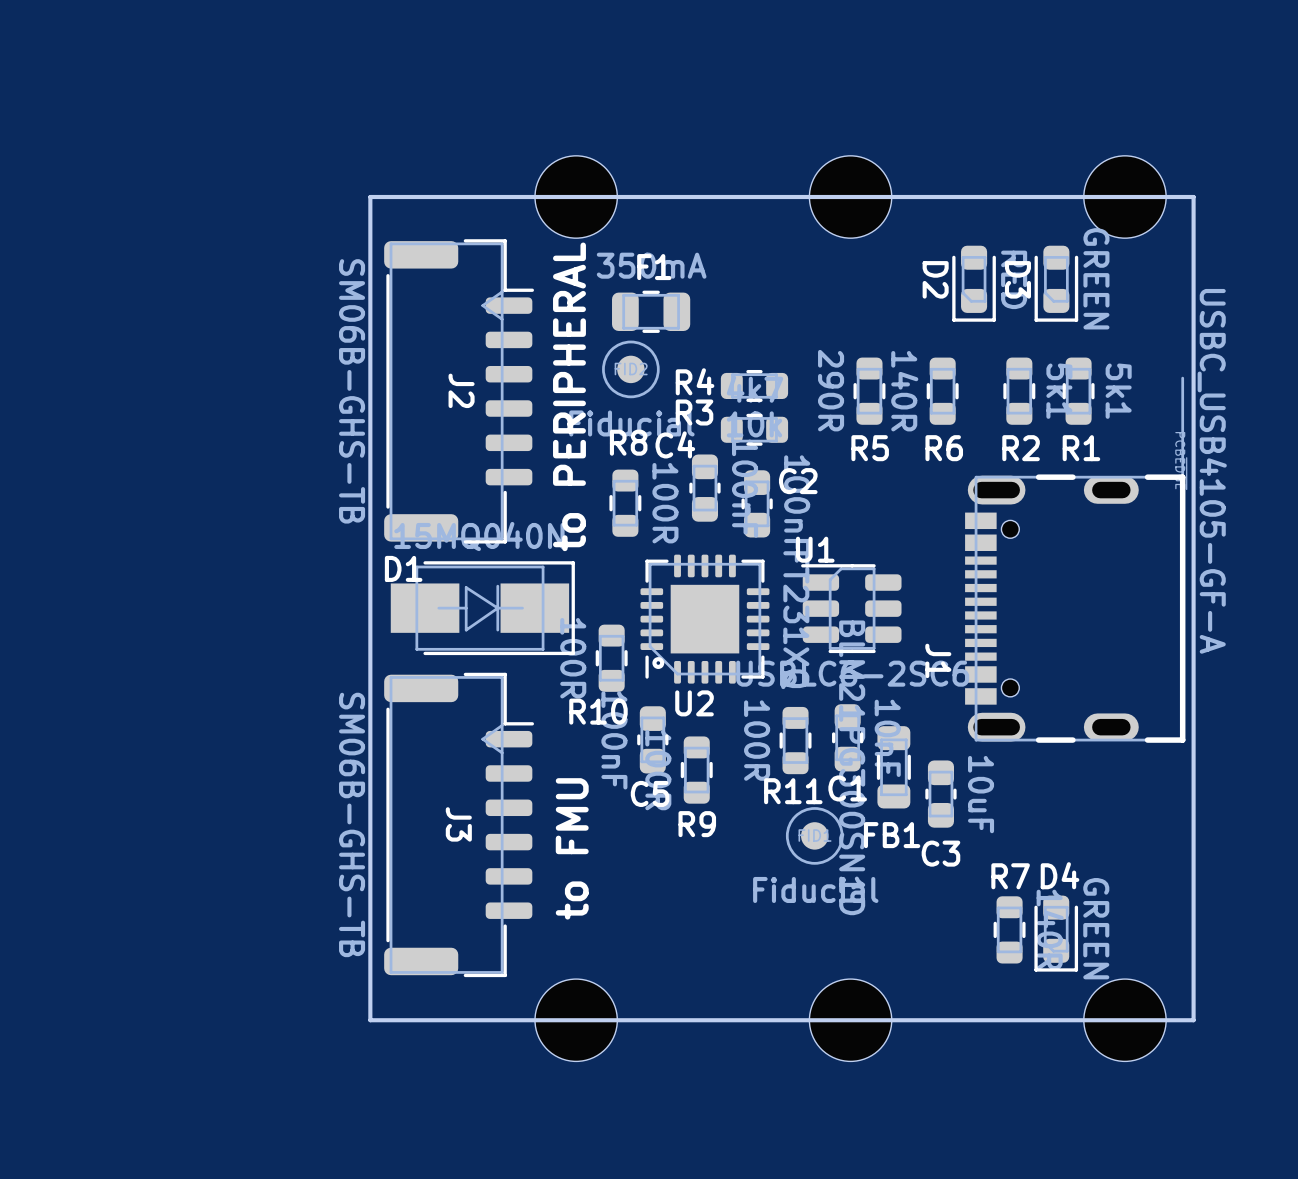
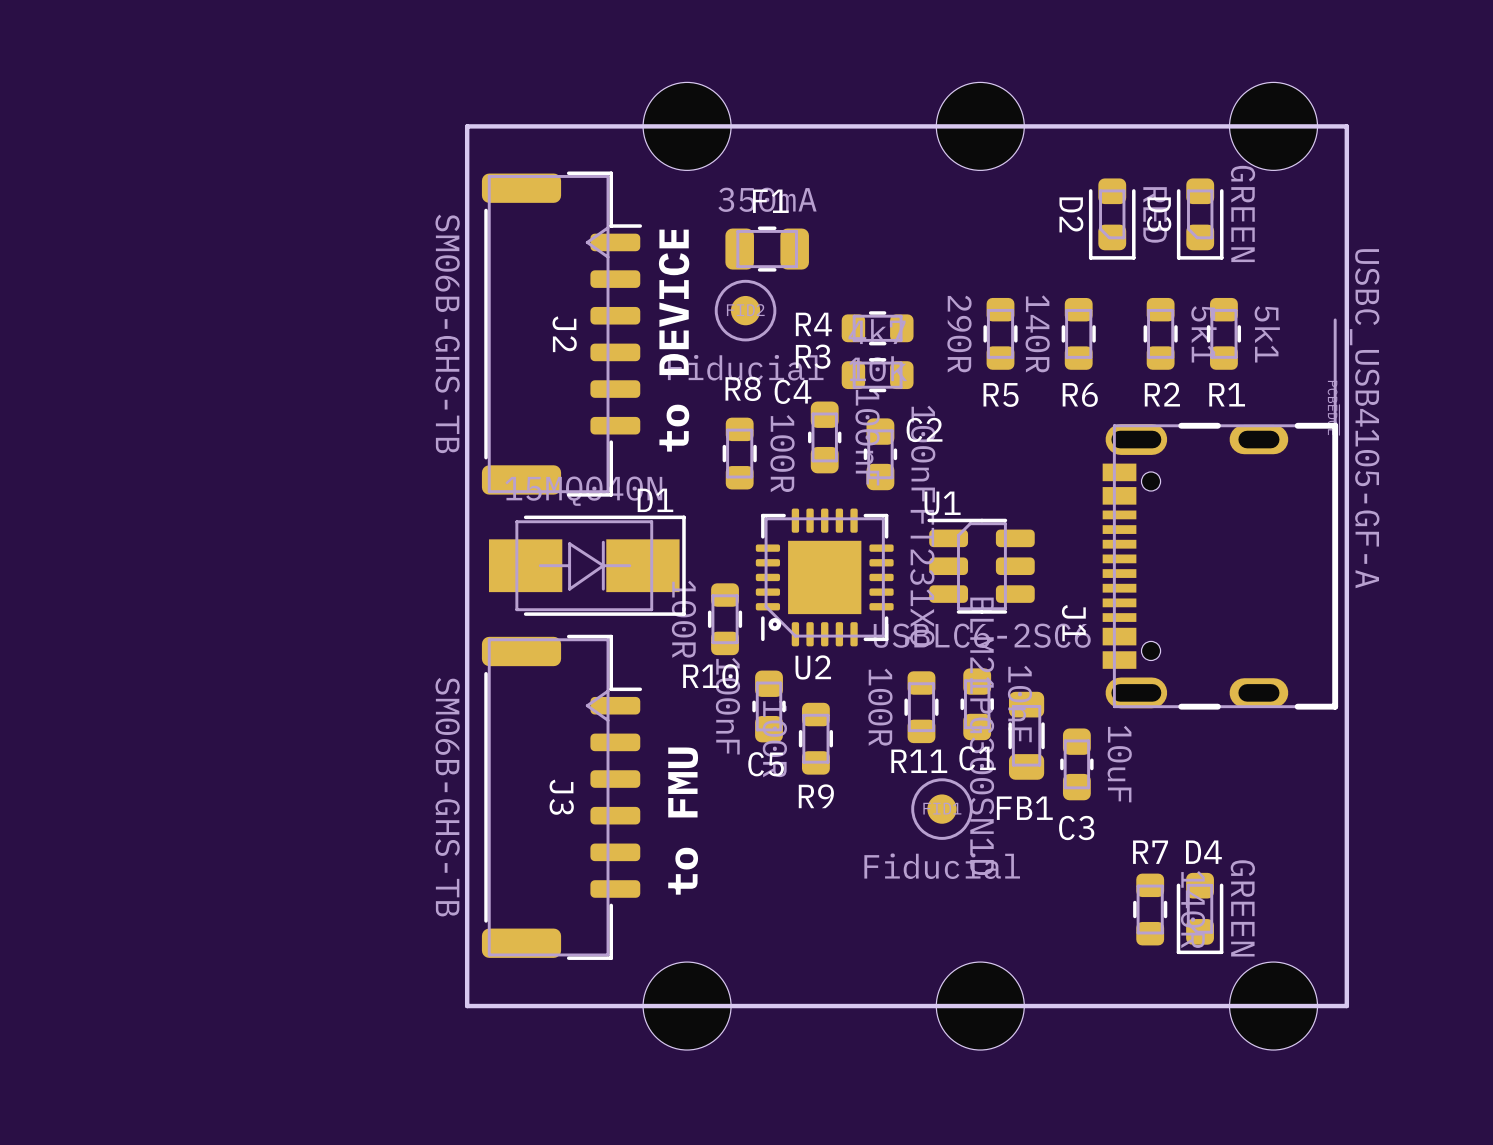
text: to PERIPHERAL (569, 396) -> to DEVICE (674, 340)
D1 name position: D1 (403, 568) -> D1 (655, 500)

